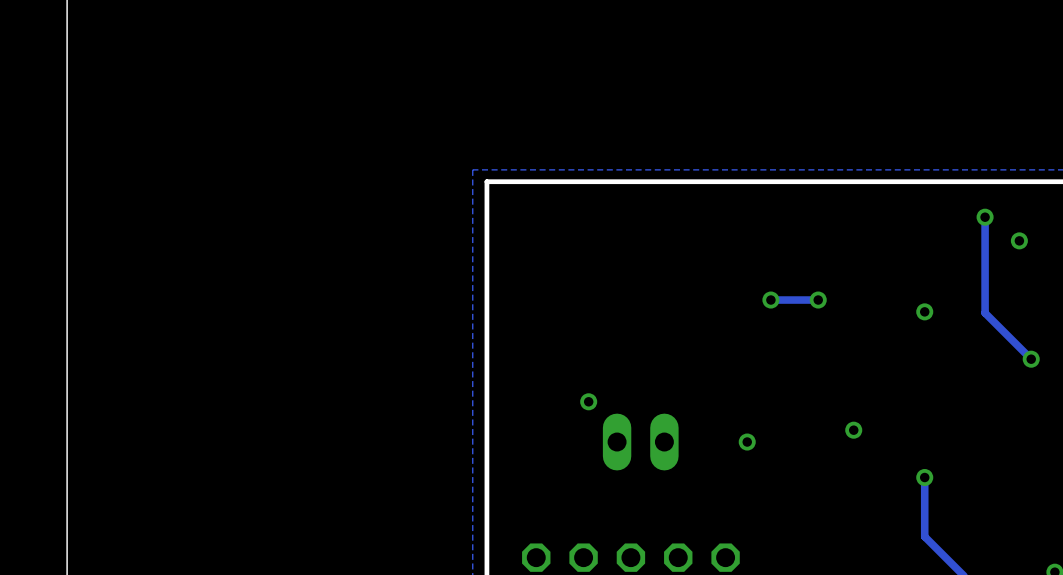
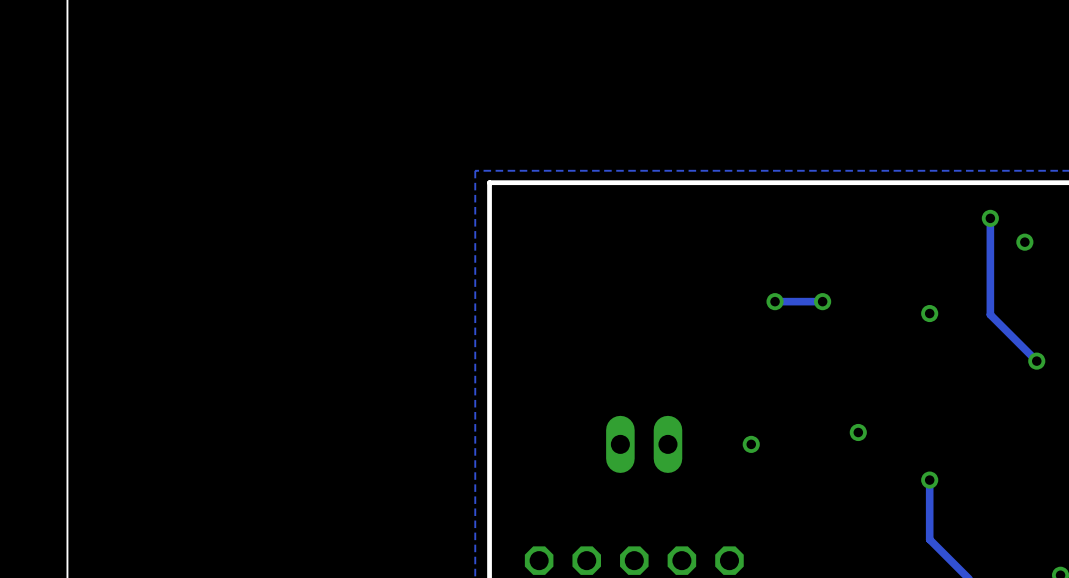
via: (588, 401) -> none

